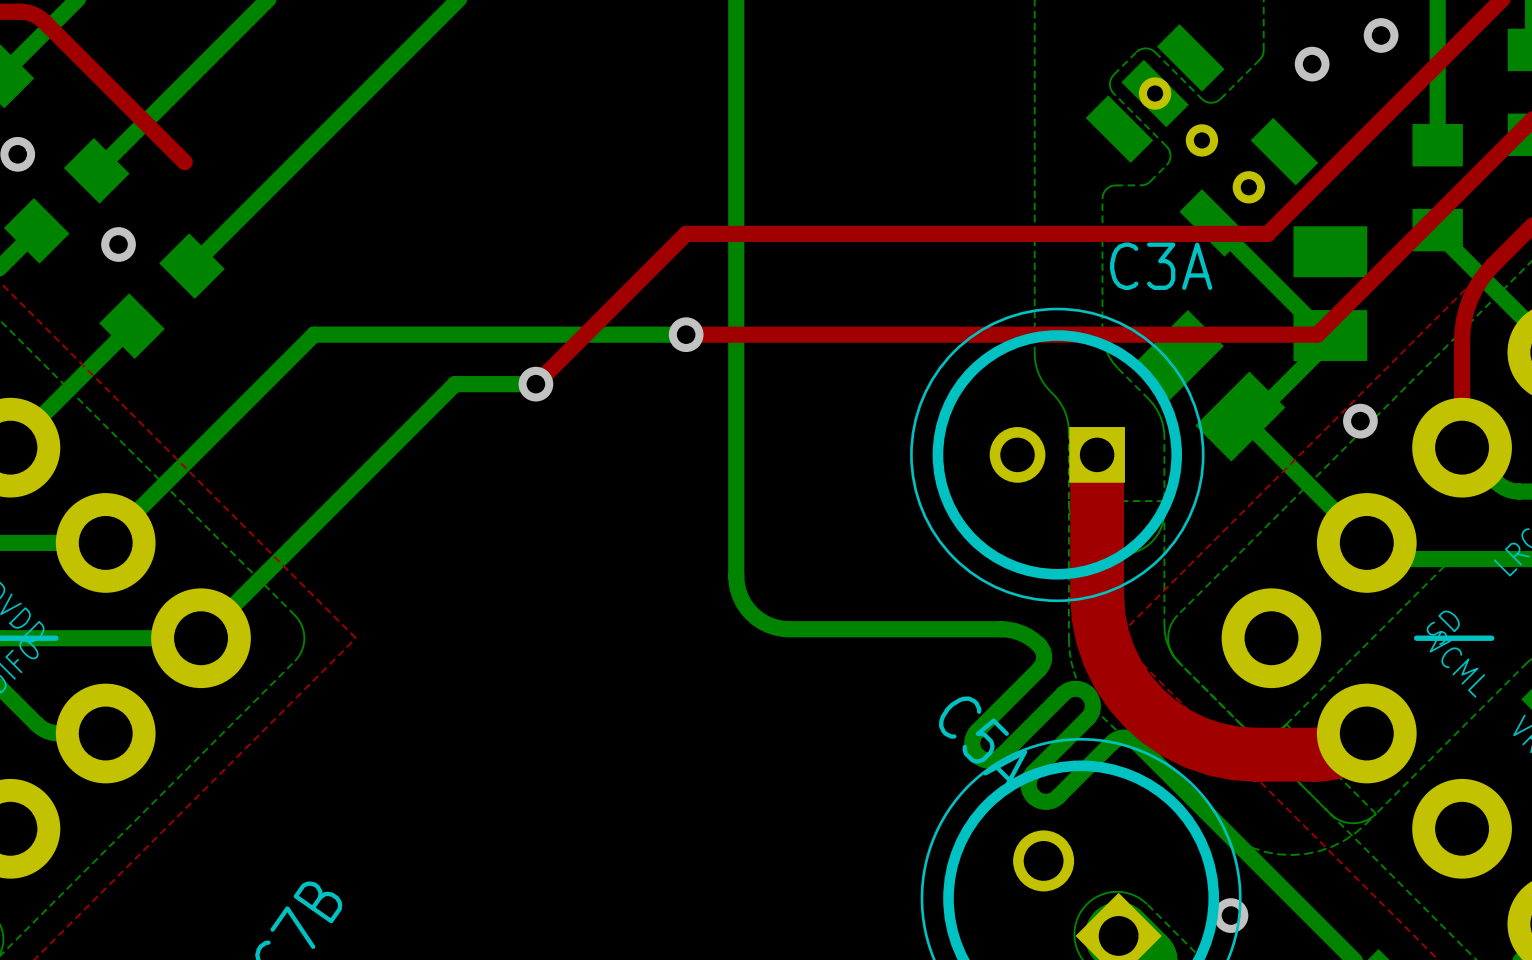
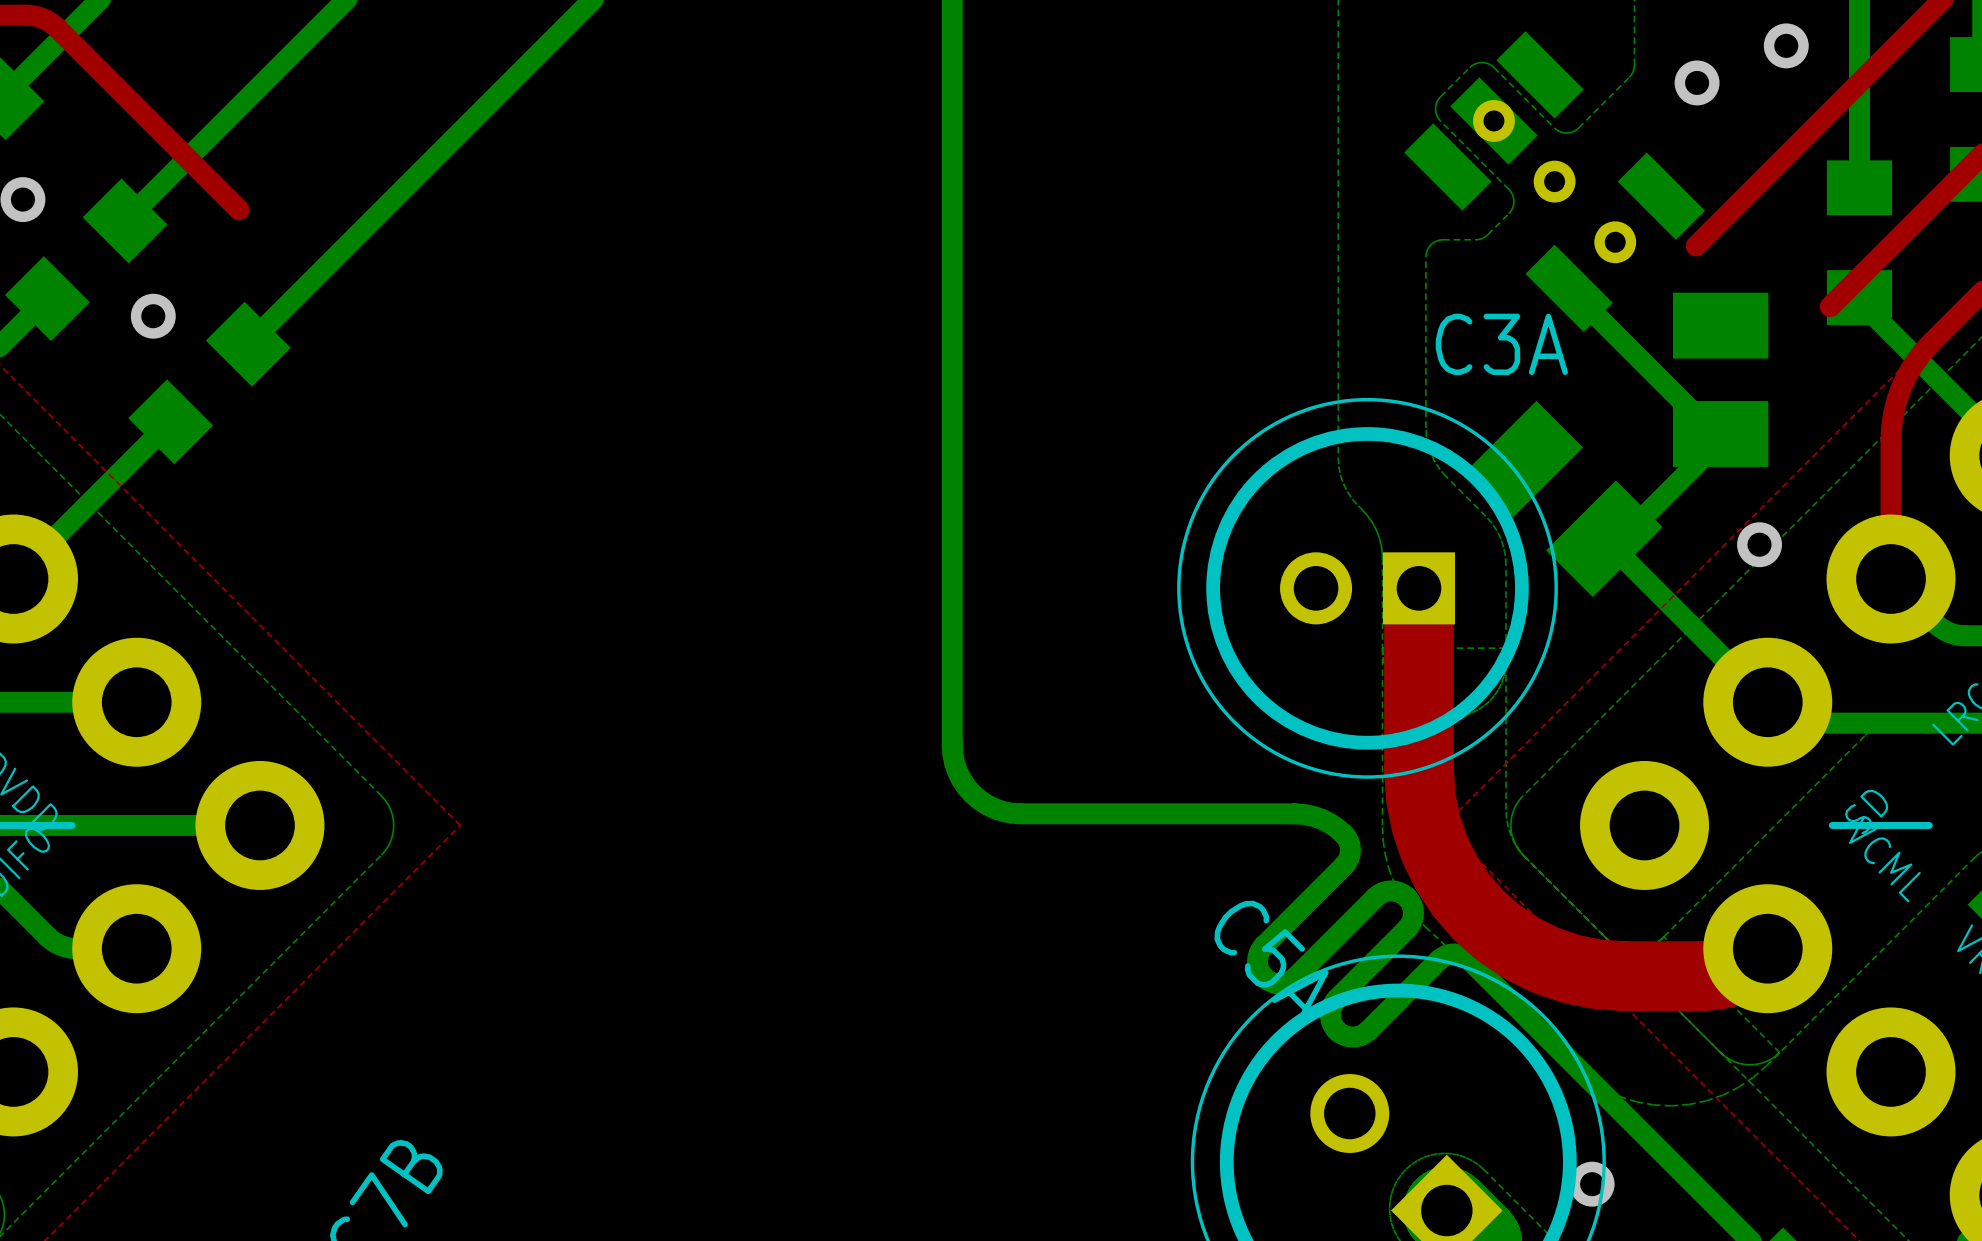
top track: (1311, 190) (1267, 233) (686, 233) (535, 384) -> none
top track: (1415, 237) (1317, 334) (686, 334) -> none
bottom track: (686, 334) (313, 334) (105, 542) -> none
via: (686, 334) -> none
bottom track: (535, 384) (455, 384) (200, 638) -> none
via: (535, 384) -> none

